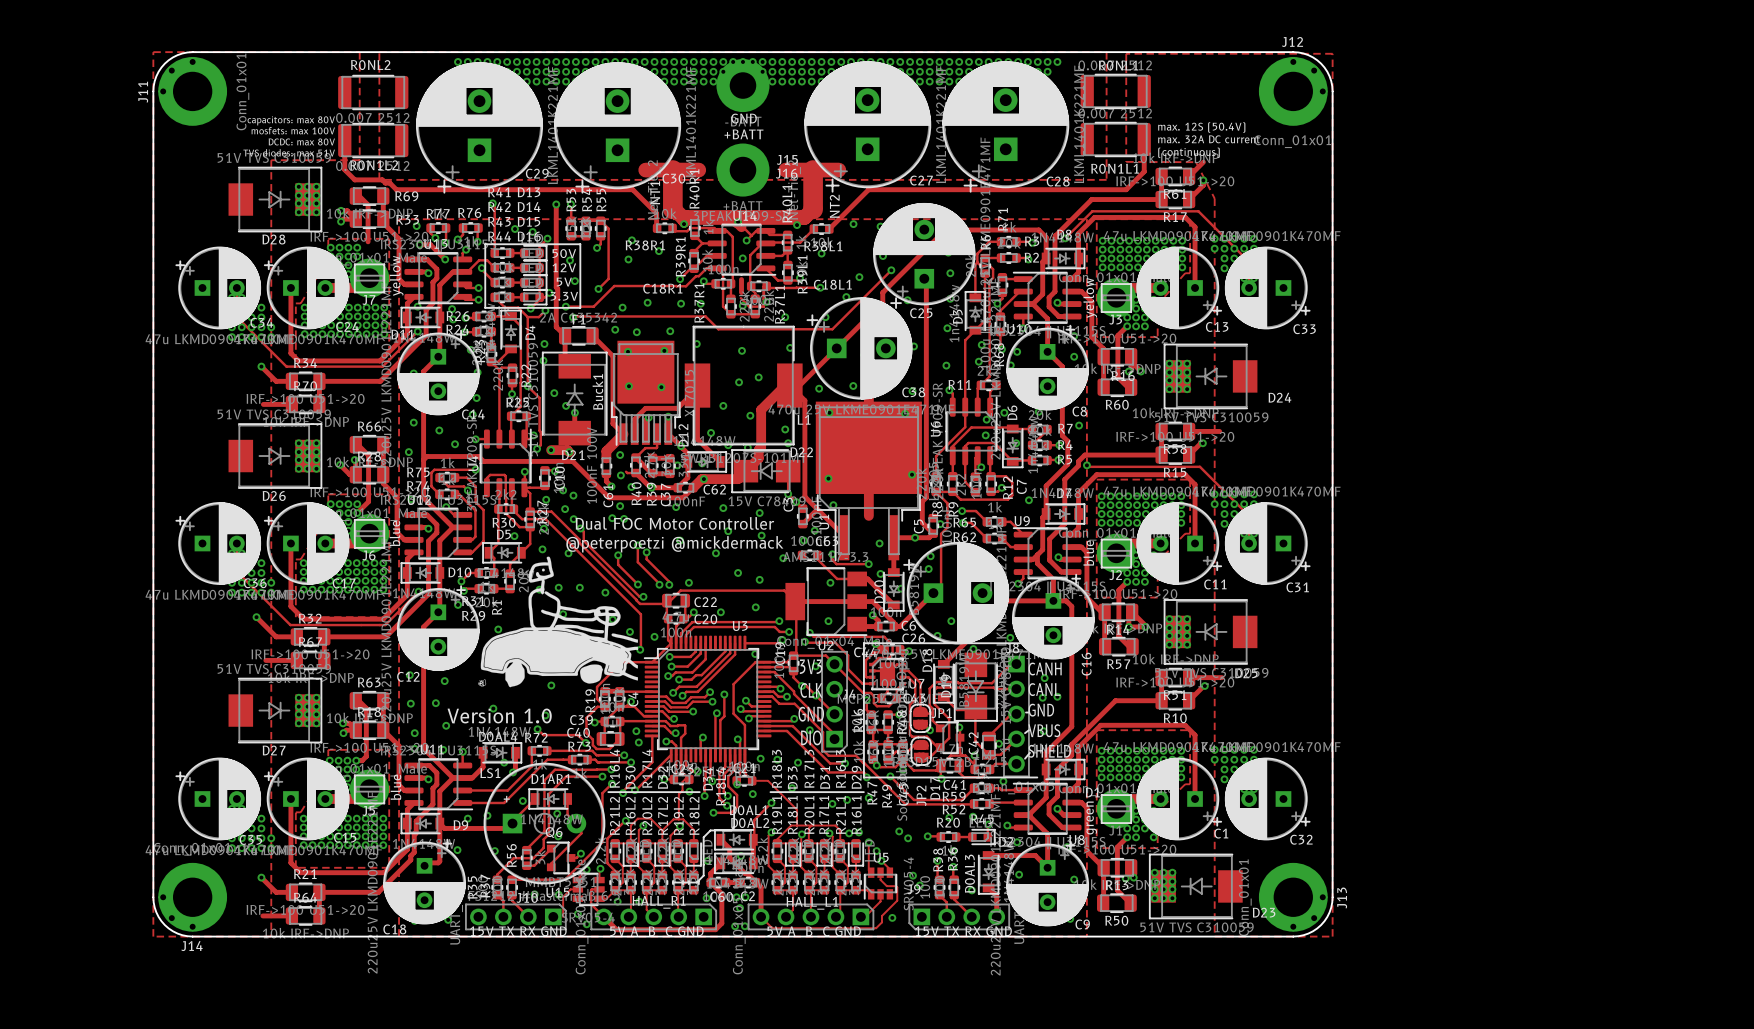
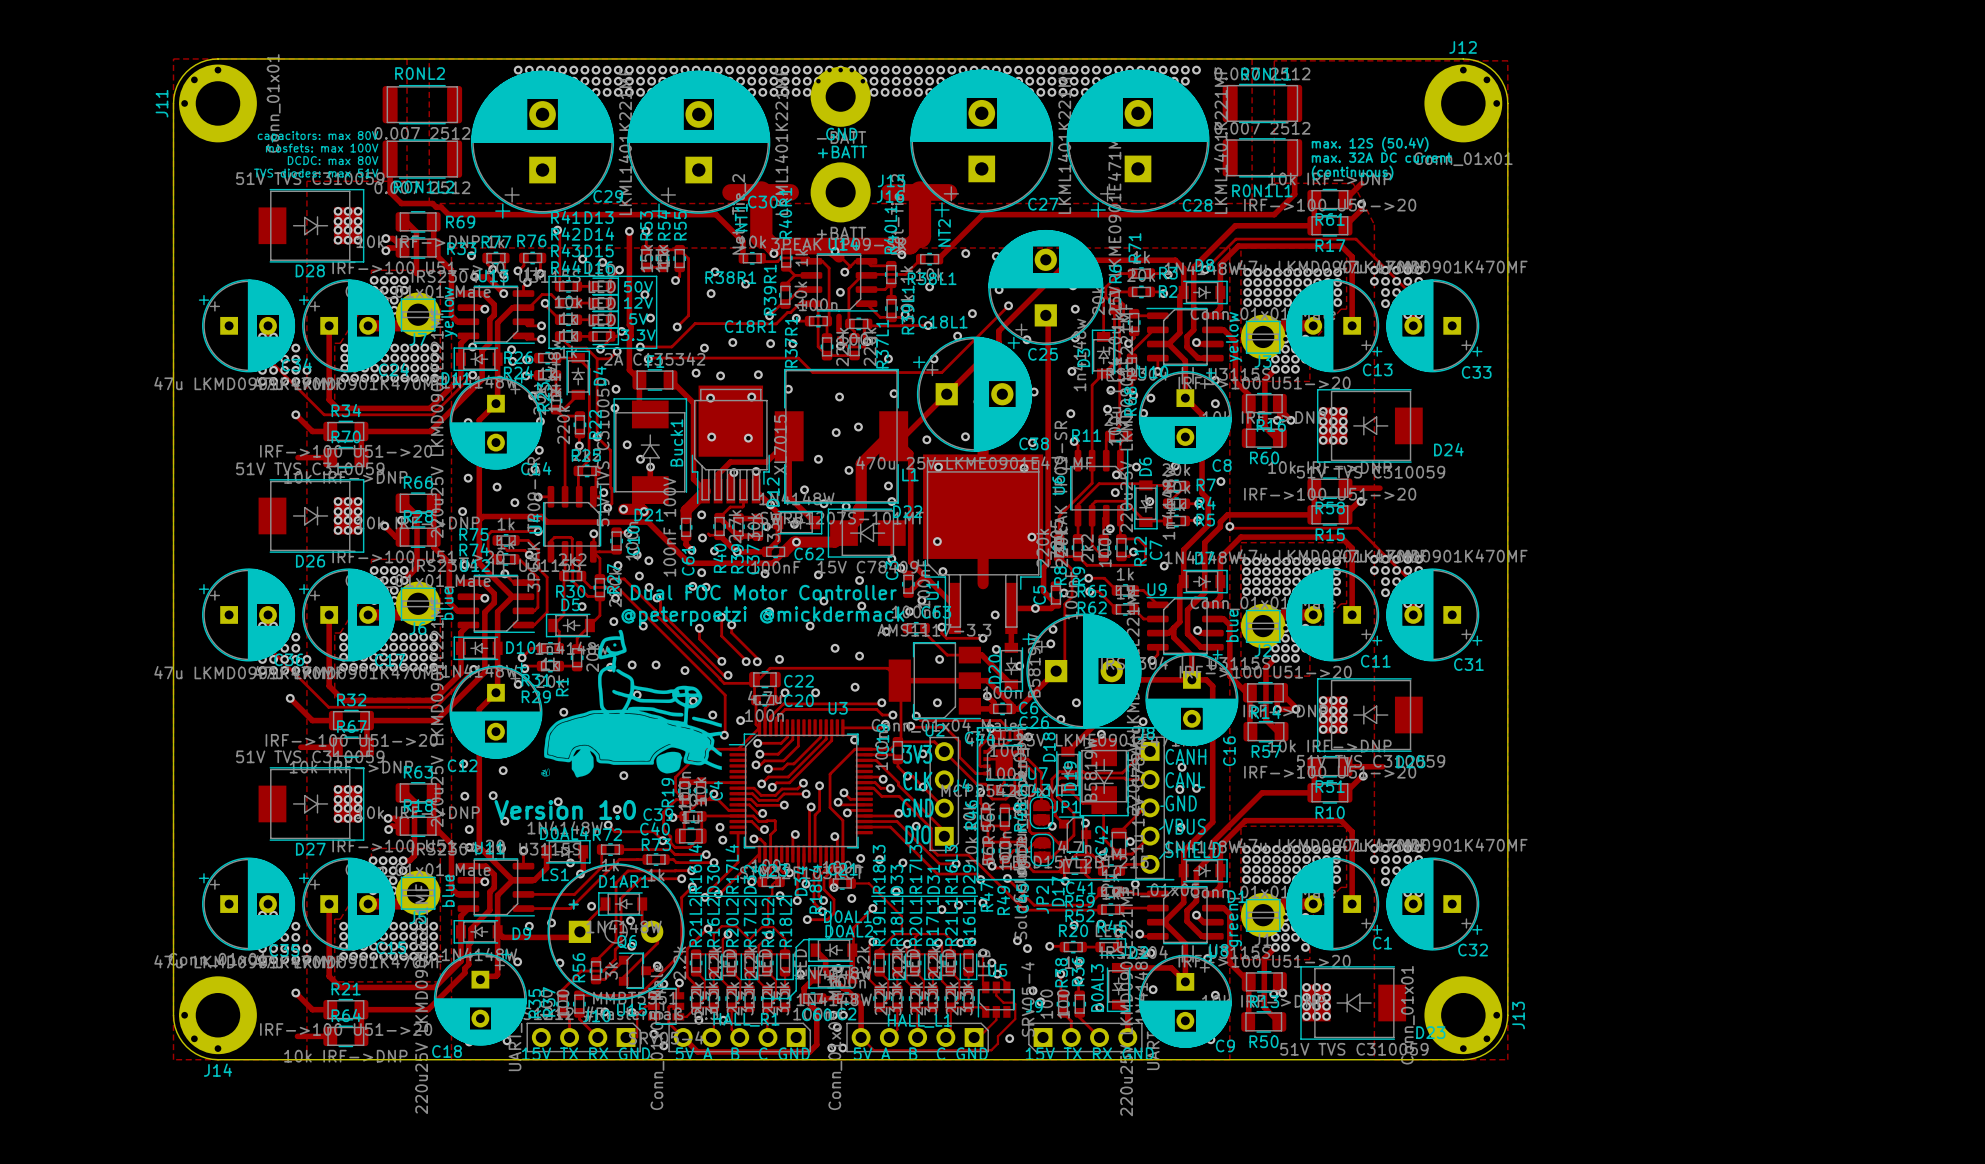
via: (706, 898) -> none

